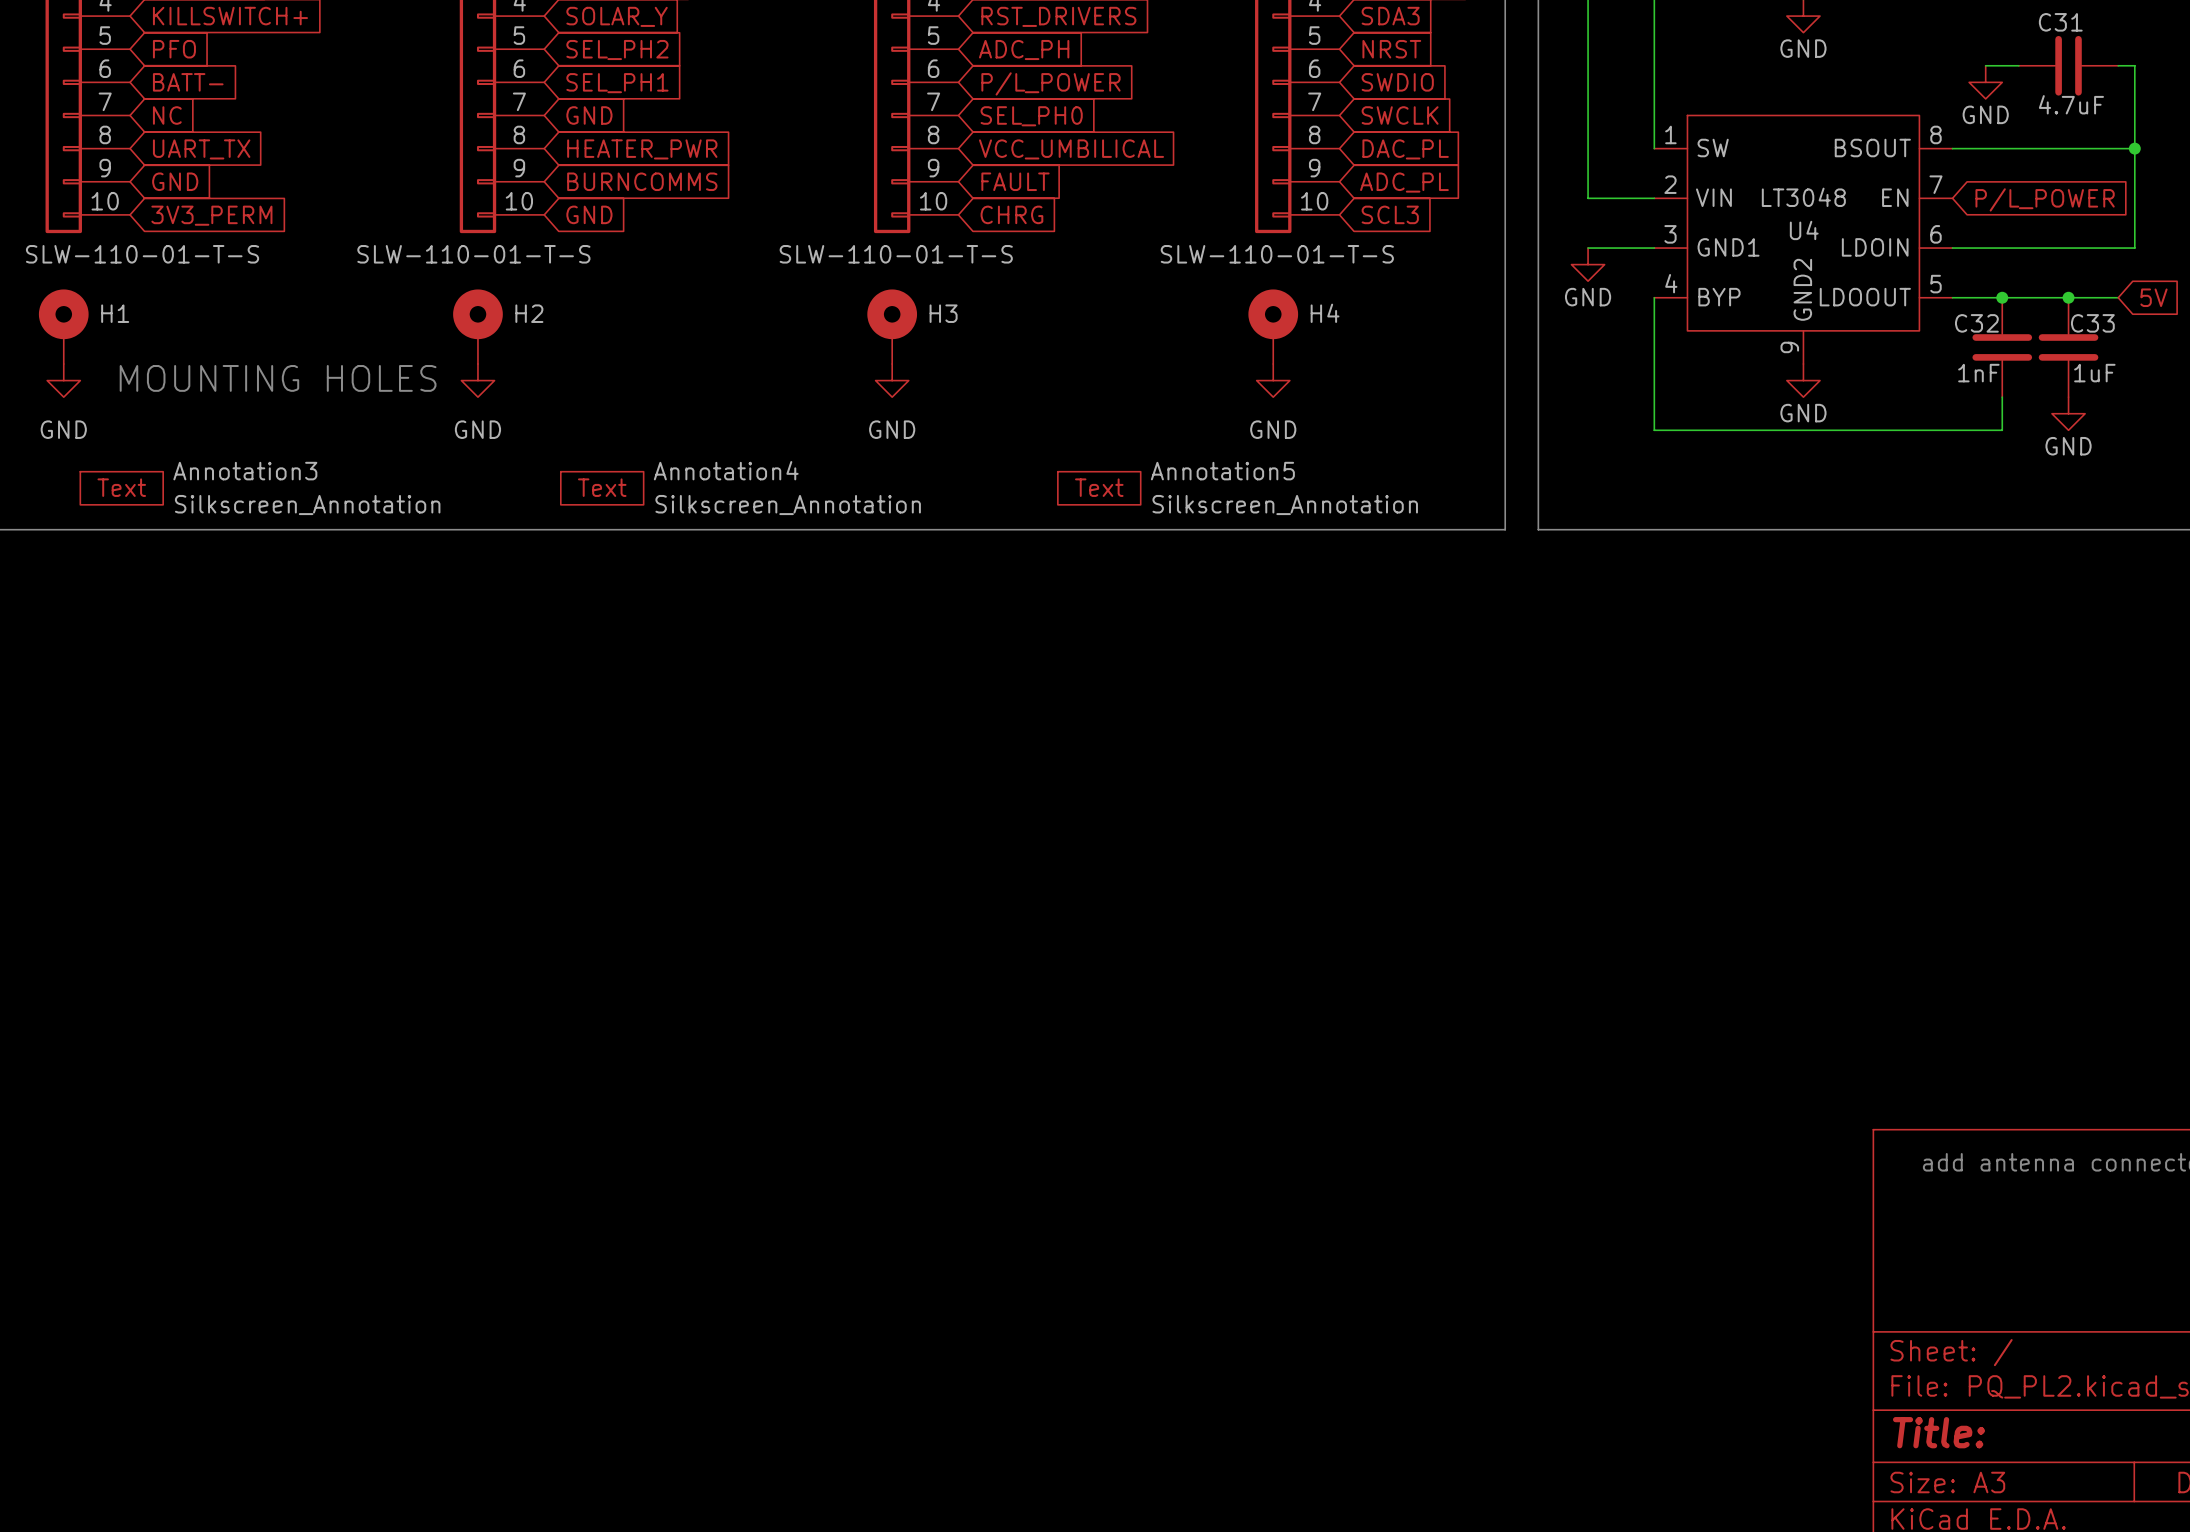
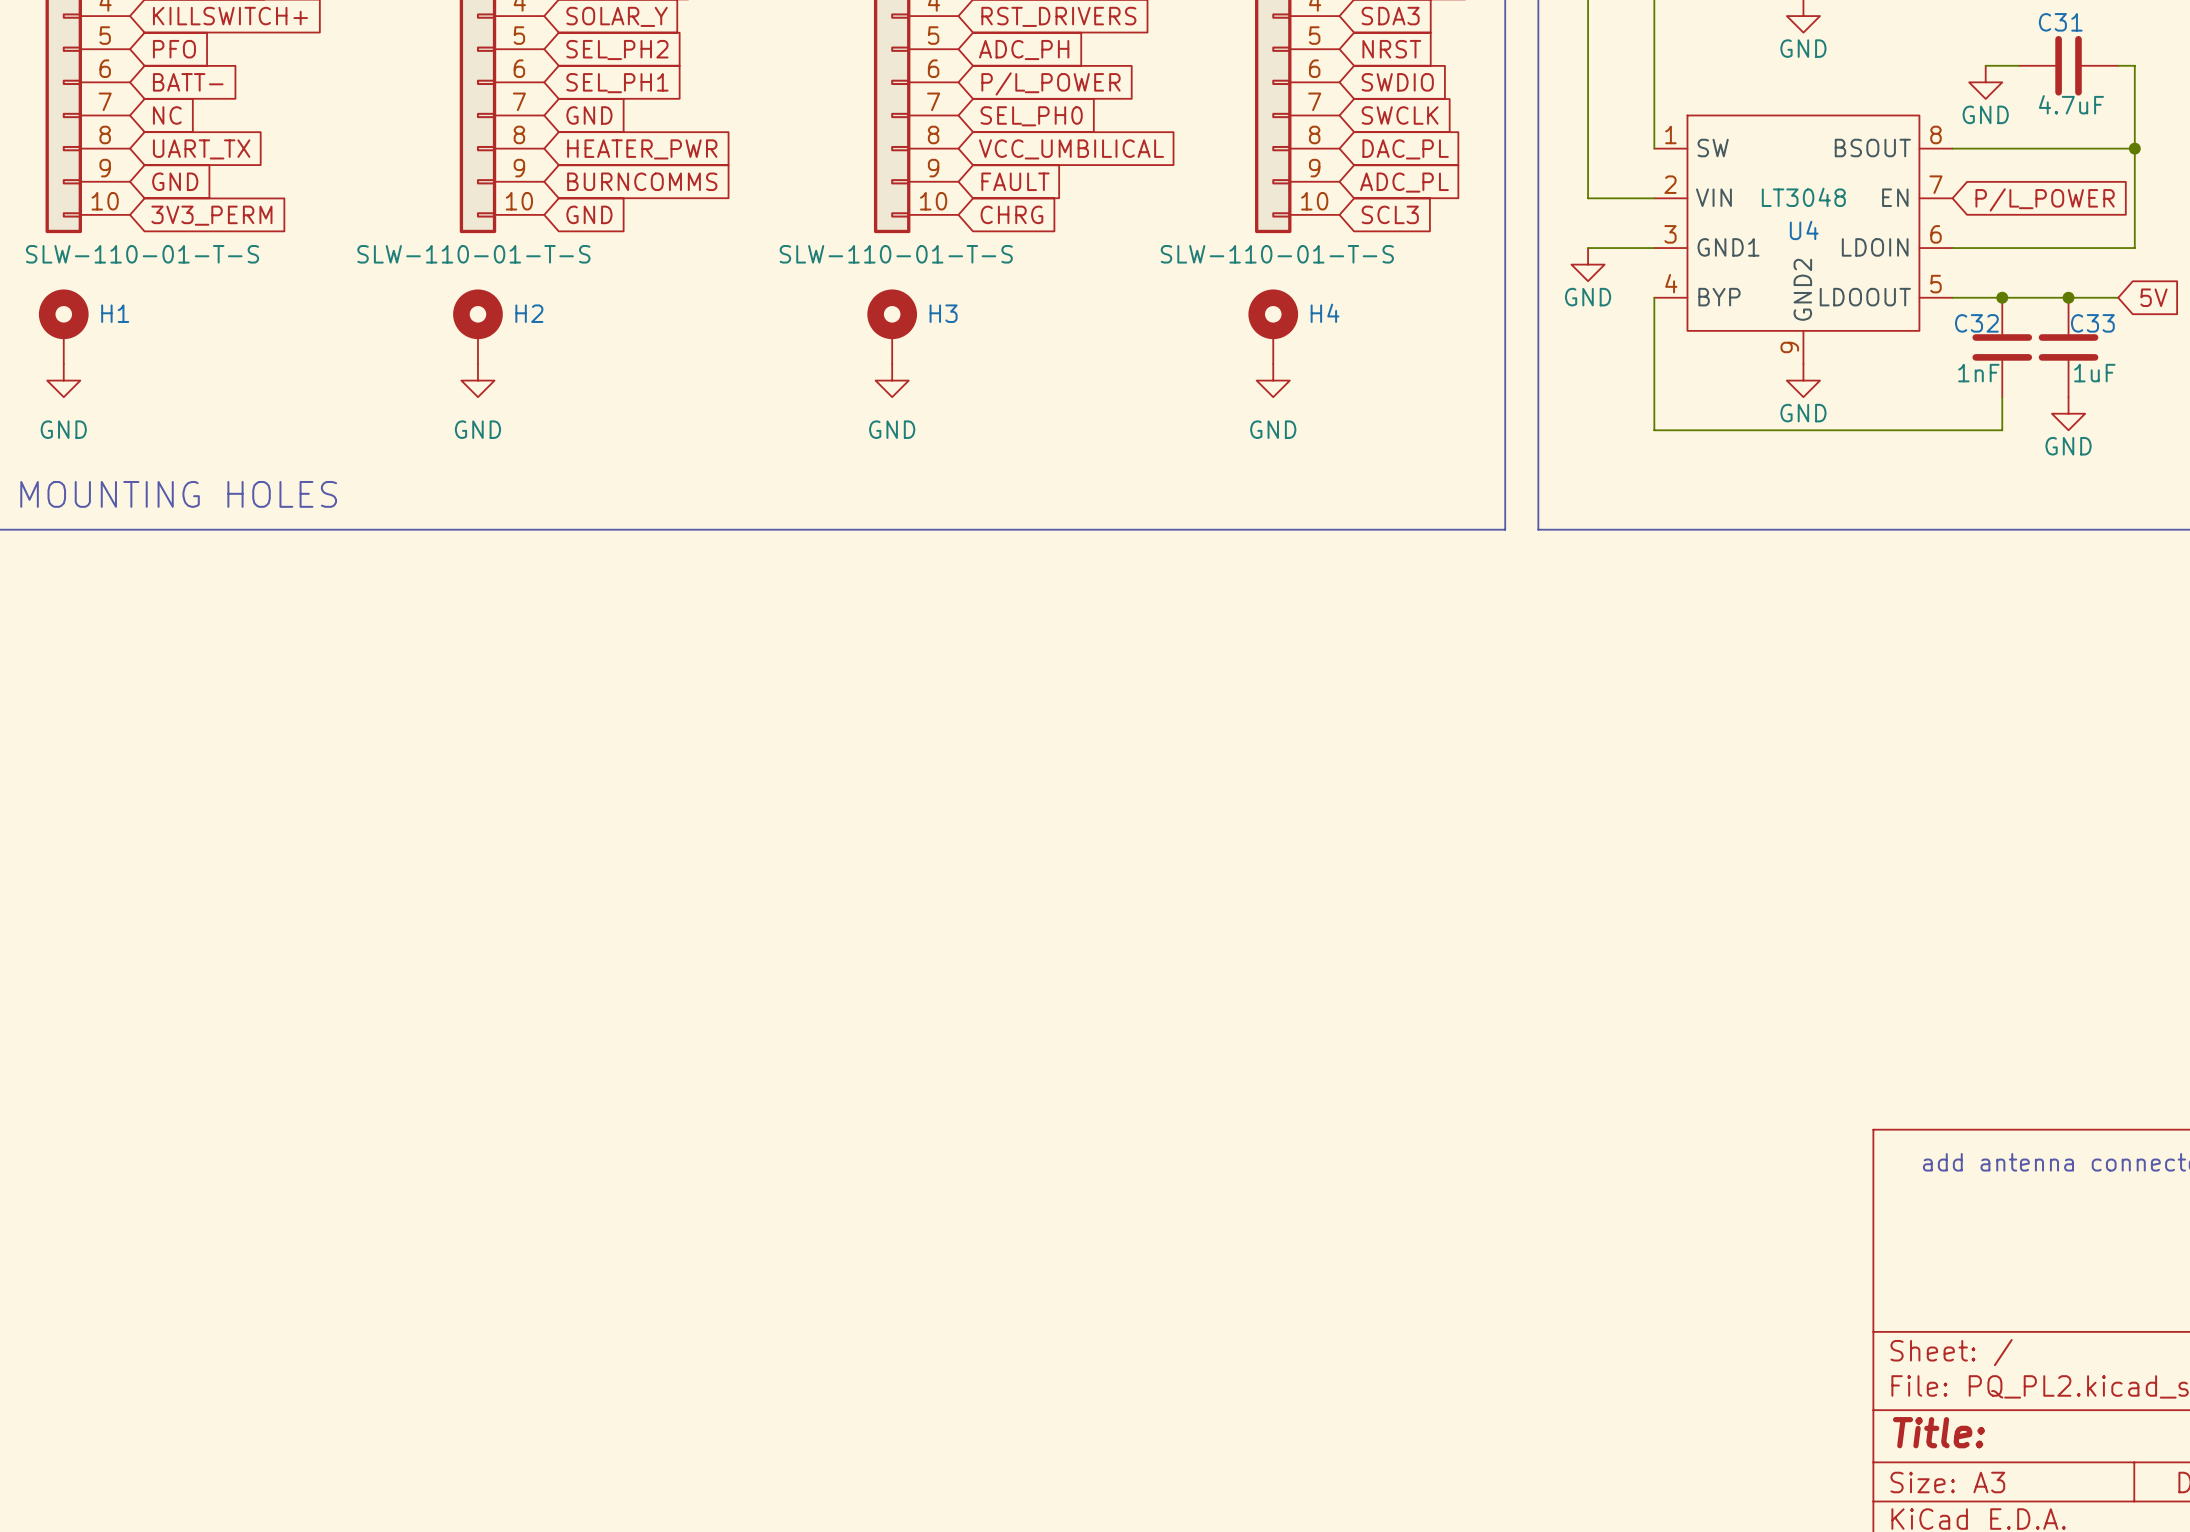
text position: MOUNTING HOLES (278, 378) -> MOUNTING HOLES (178, 494)
Annotation3: Silkscreen_Annotation (121, 488) -> none
Annotation4: Silkscreen_Annotation (602, 488) -> none
Annotation5: Silkscreen_Annotation (1099, 488) -> none

